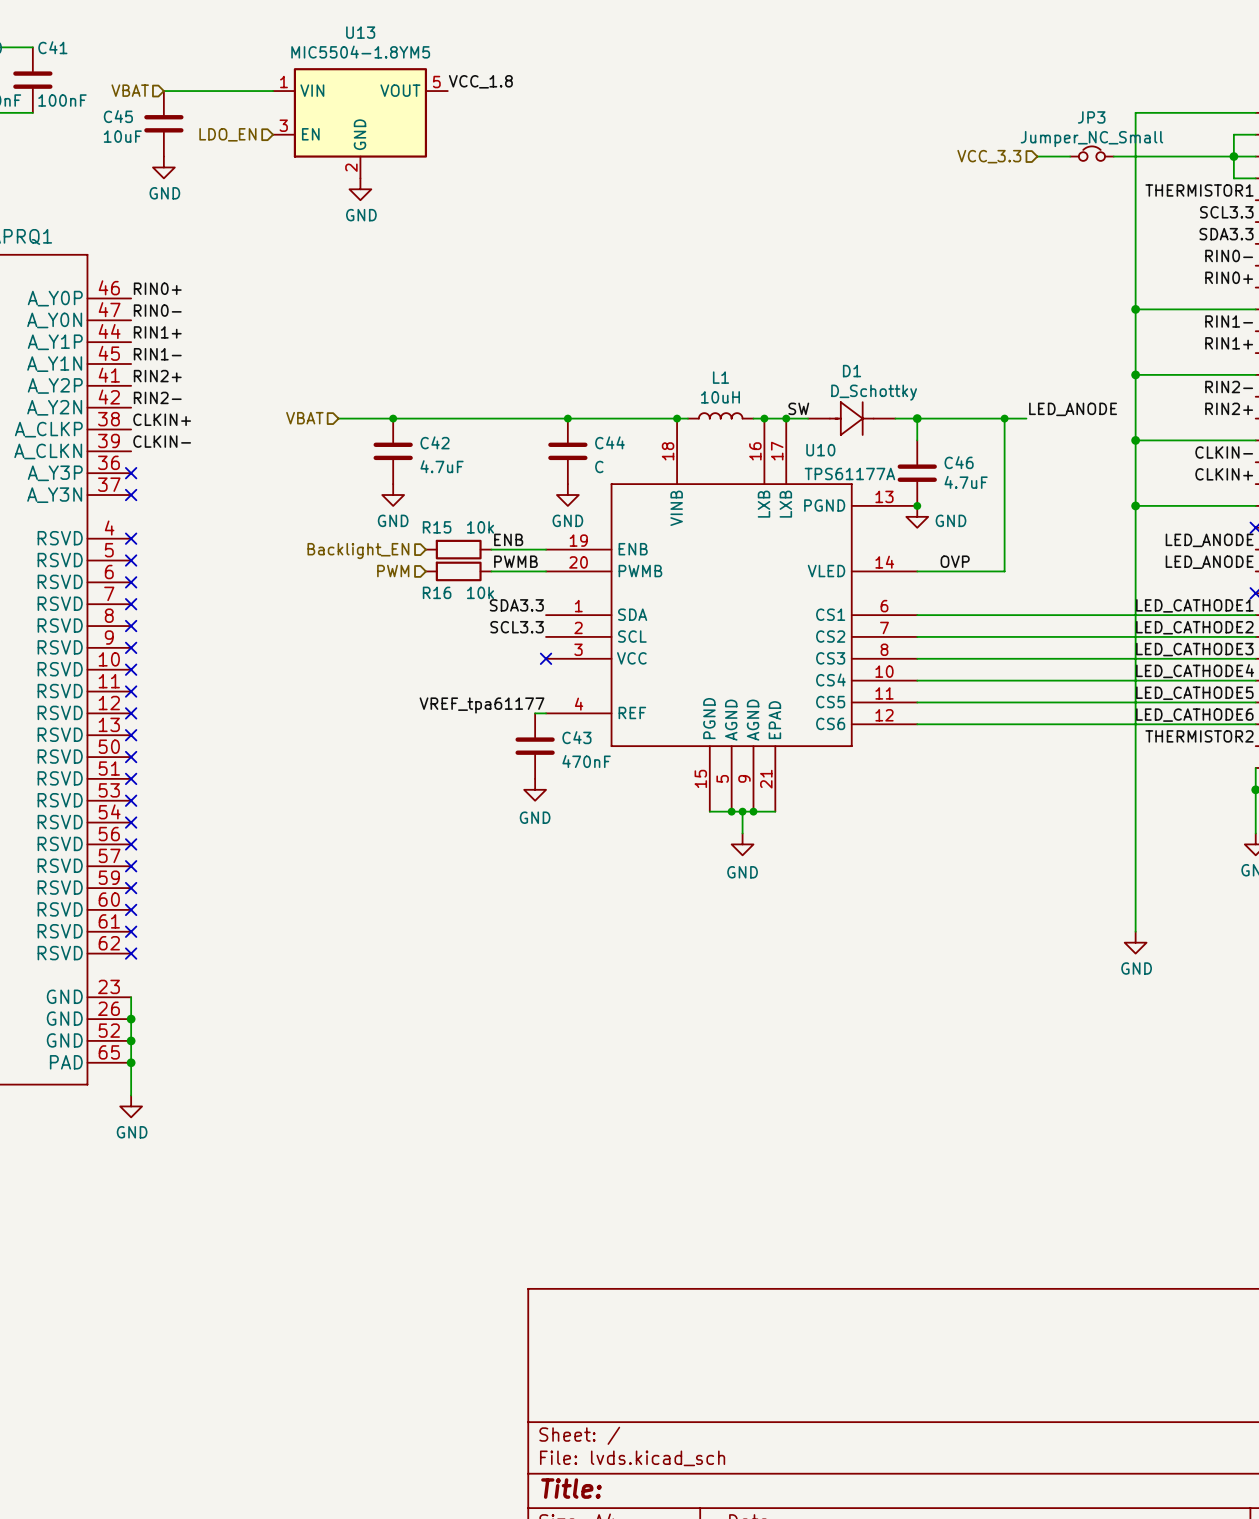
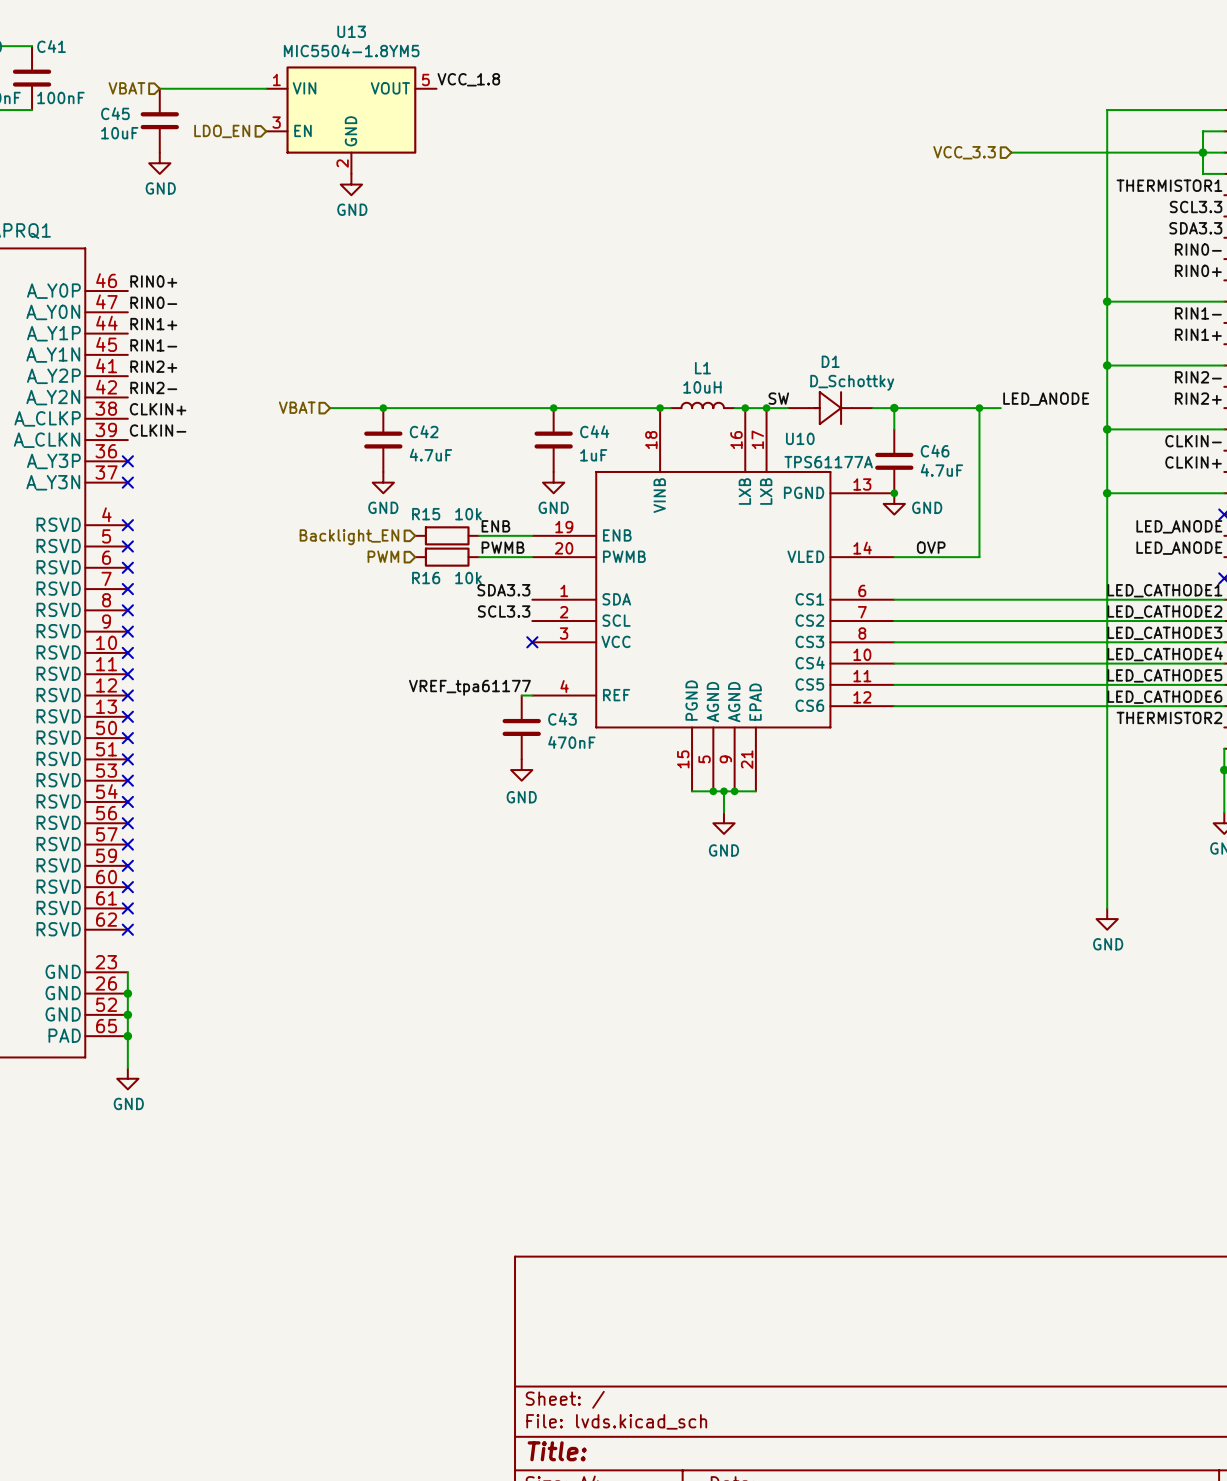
JP3: Jumper_NC_Small (1091, 153) -> none
C44 value: C (599, 466) -> 1uF (593, 455)

